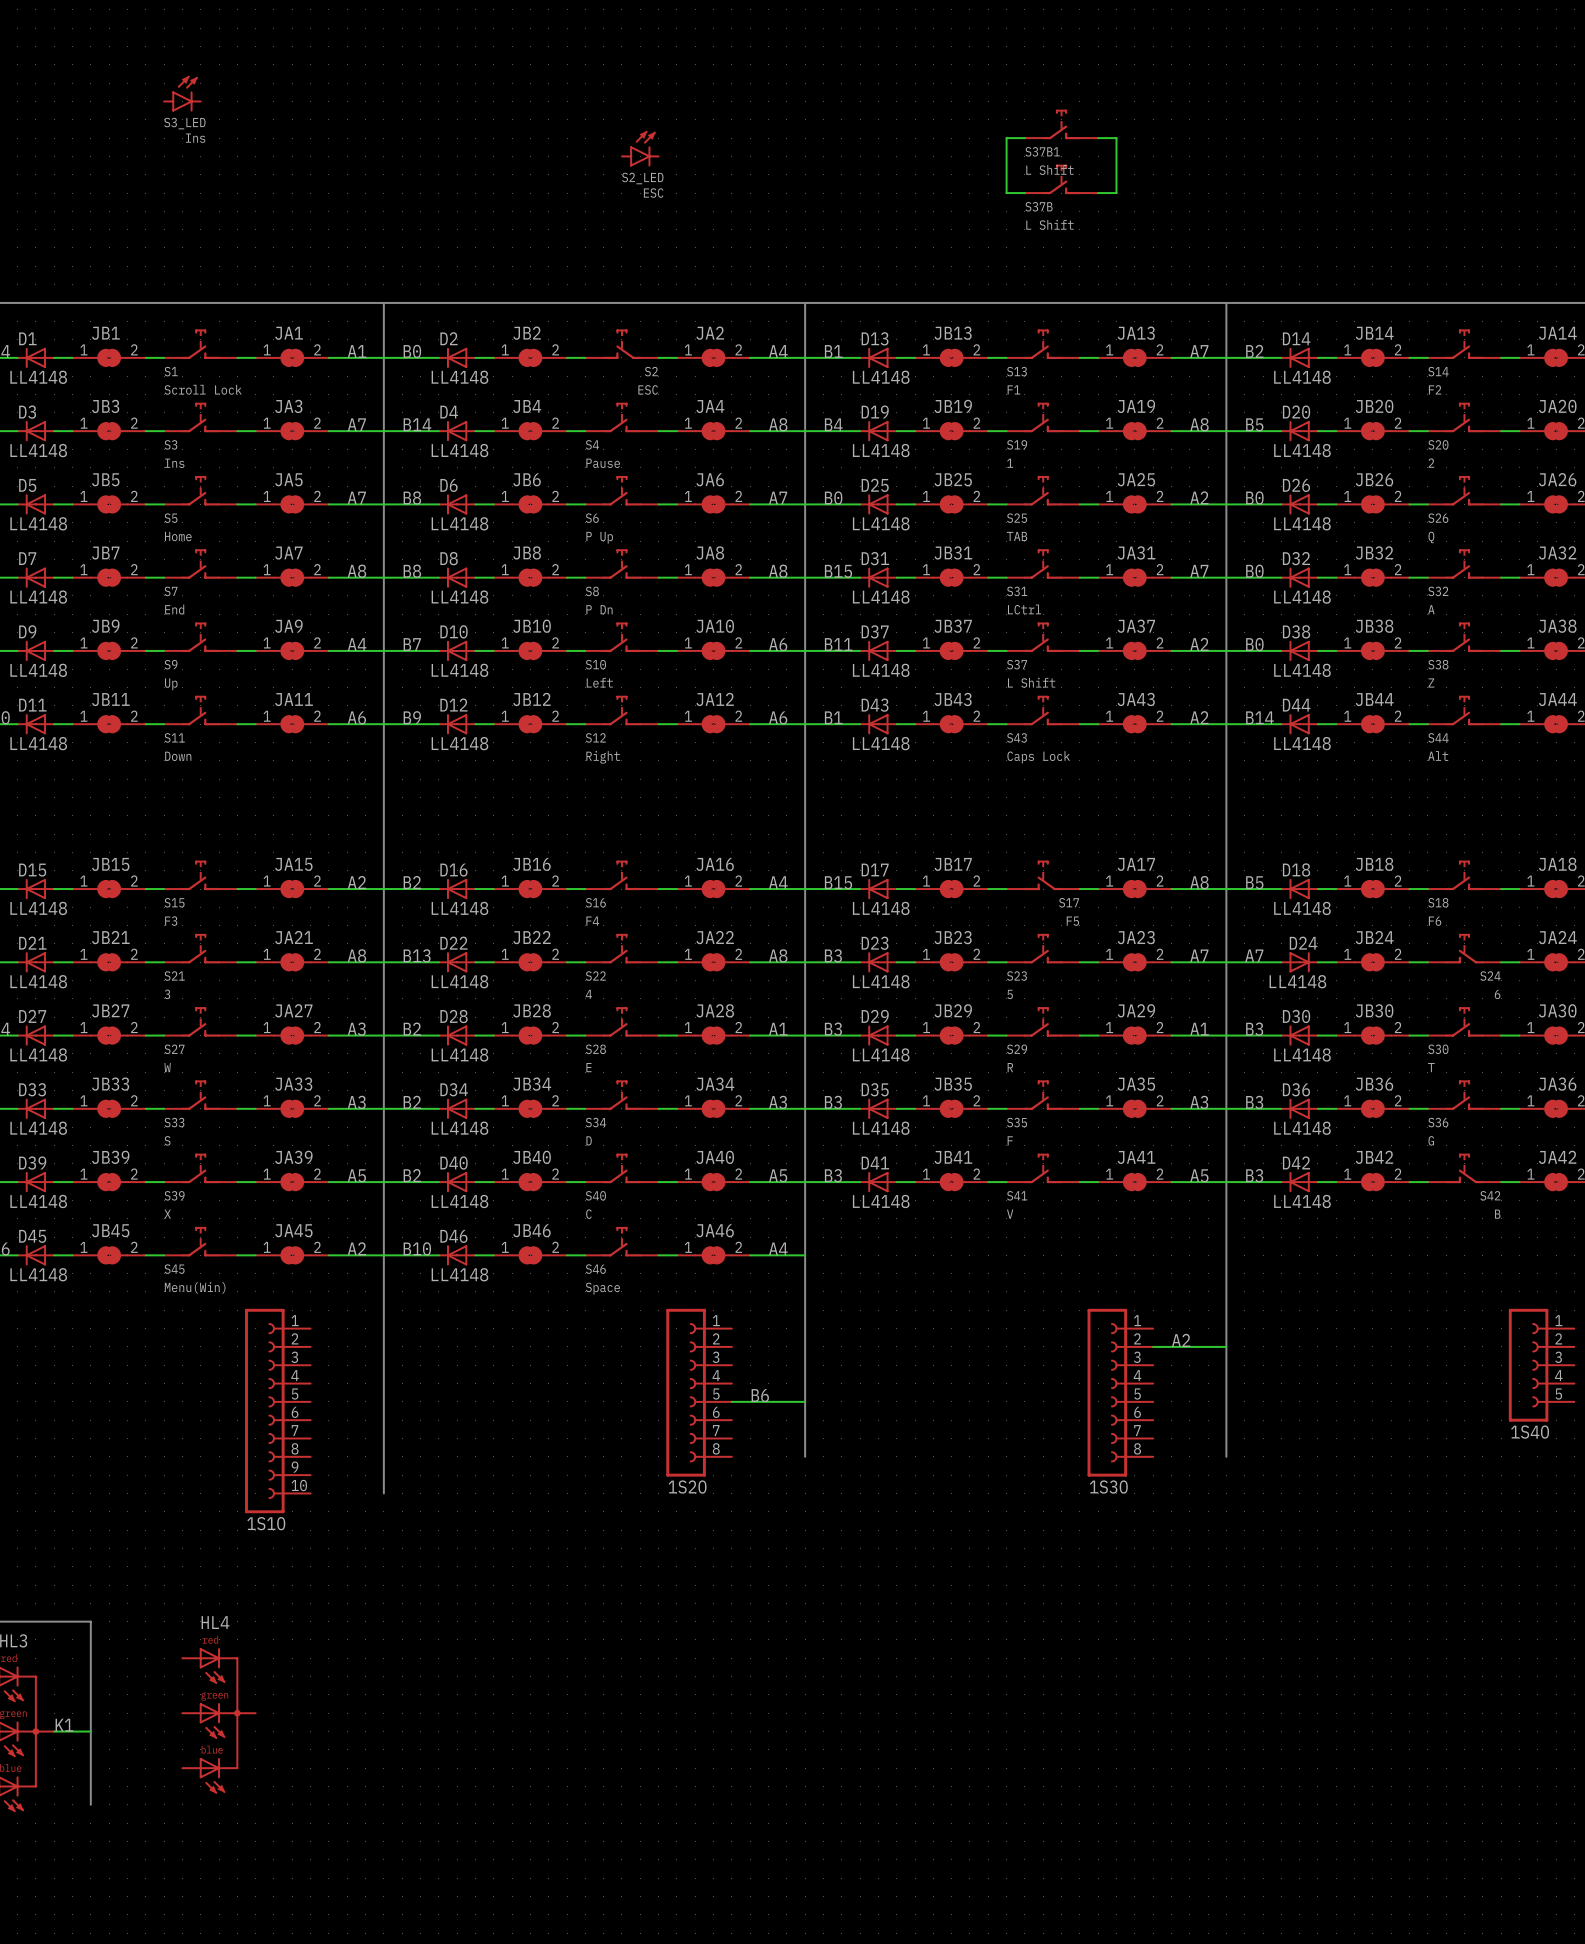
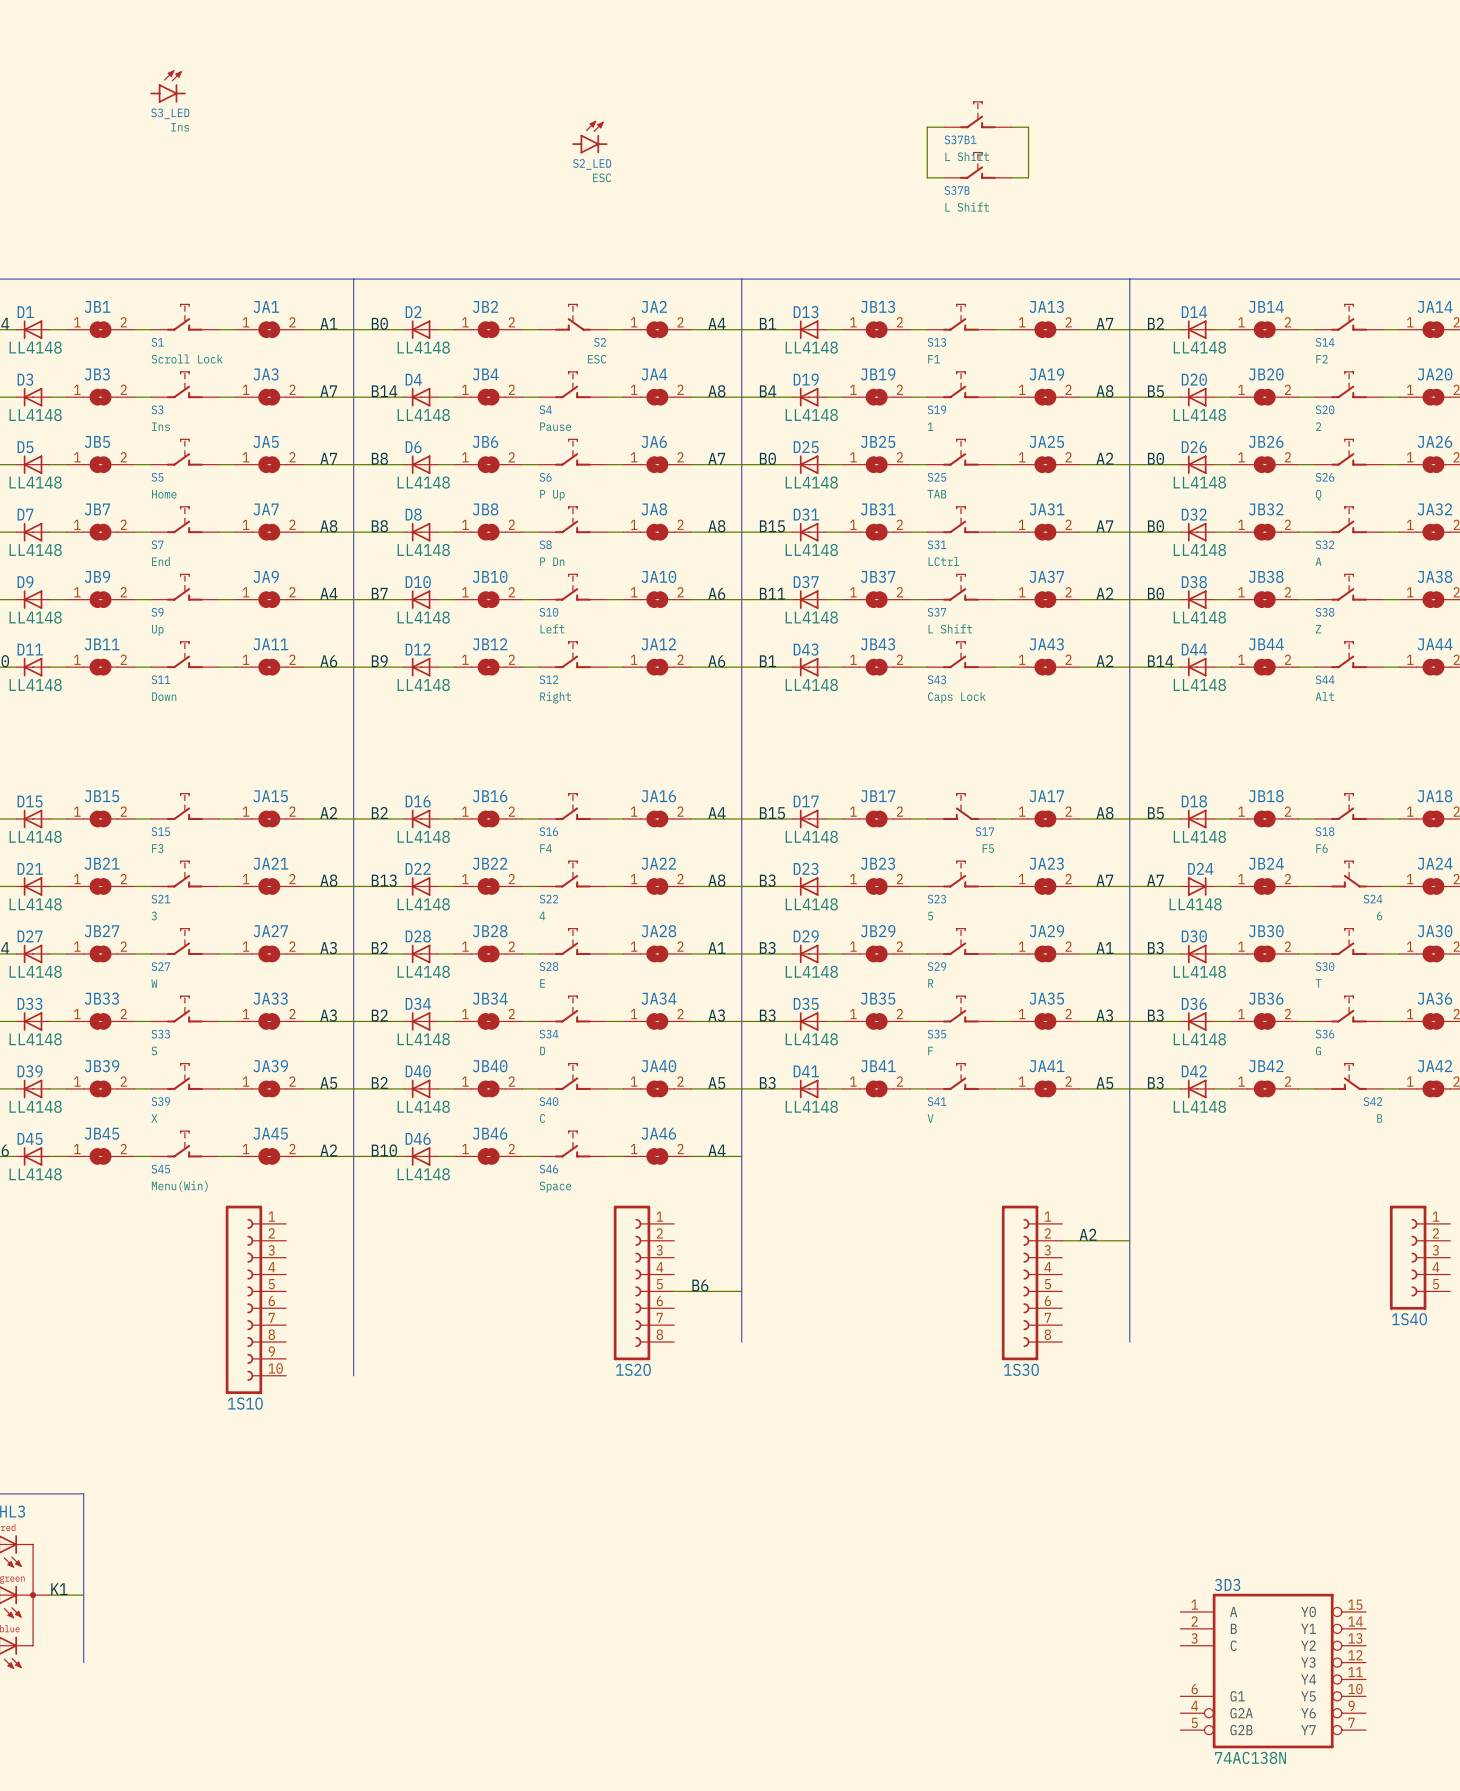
HL4: (219, 1720) -> none
3D3: none -> 74AC138N (1273, 1671)

